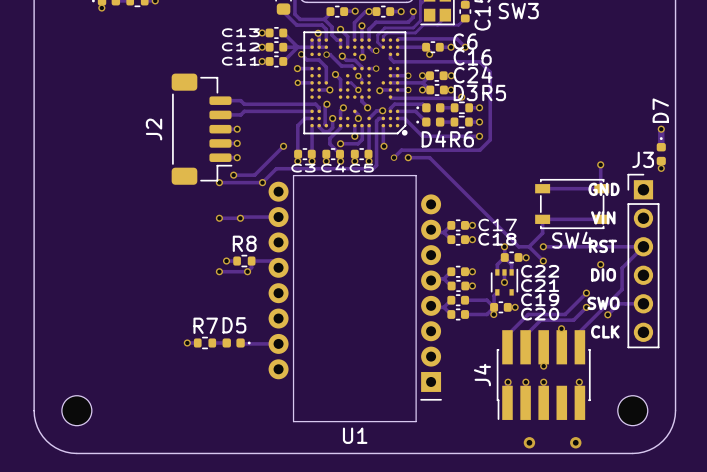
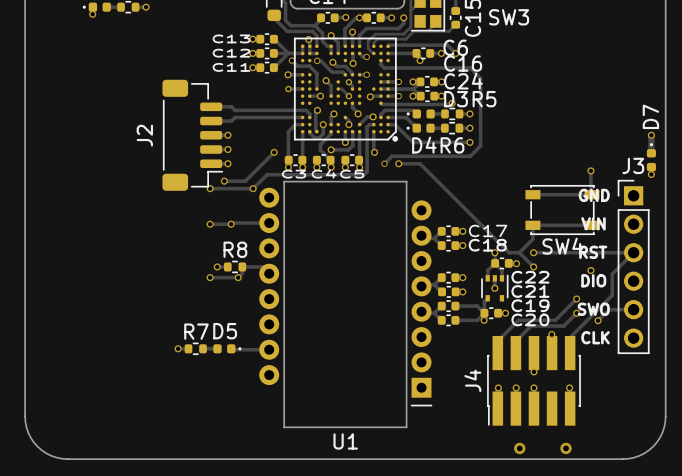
part: (76, 410) -> none
part: (632, 410) -> none

